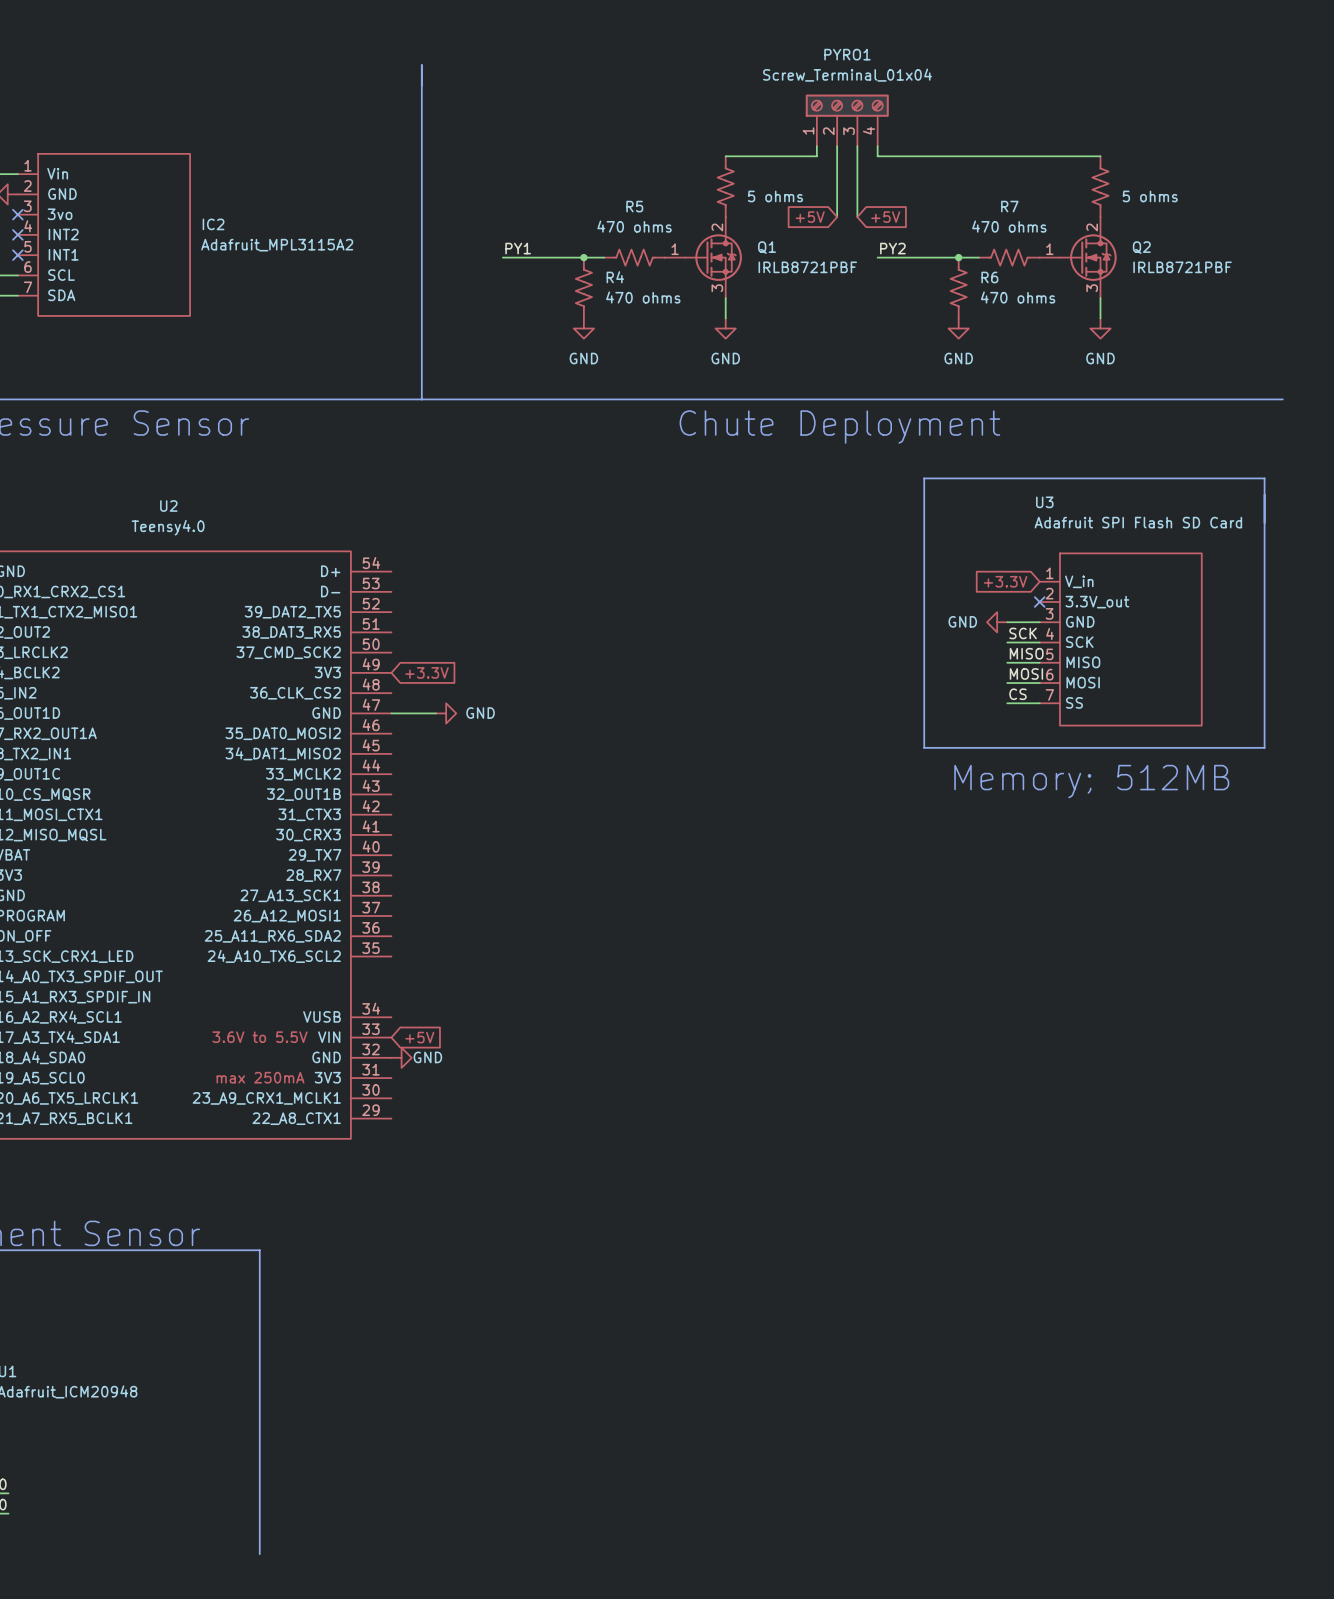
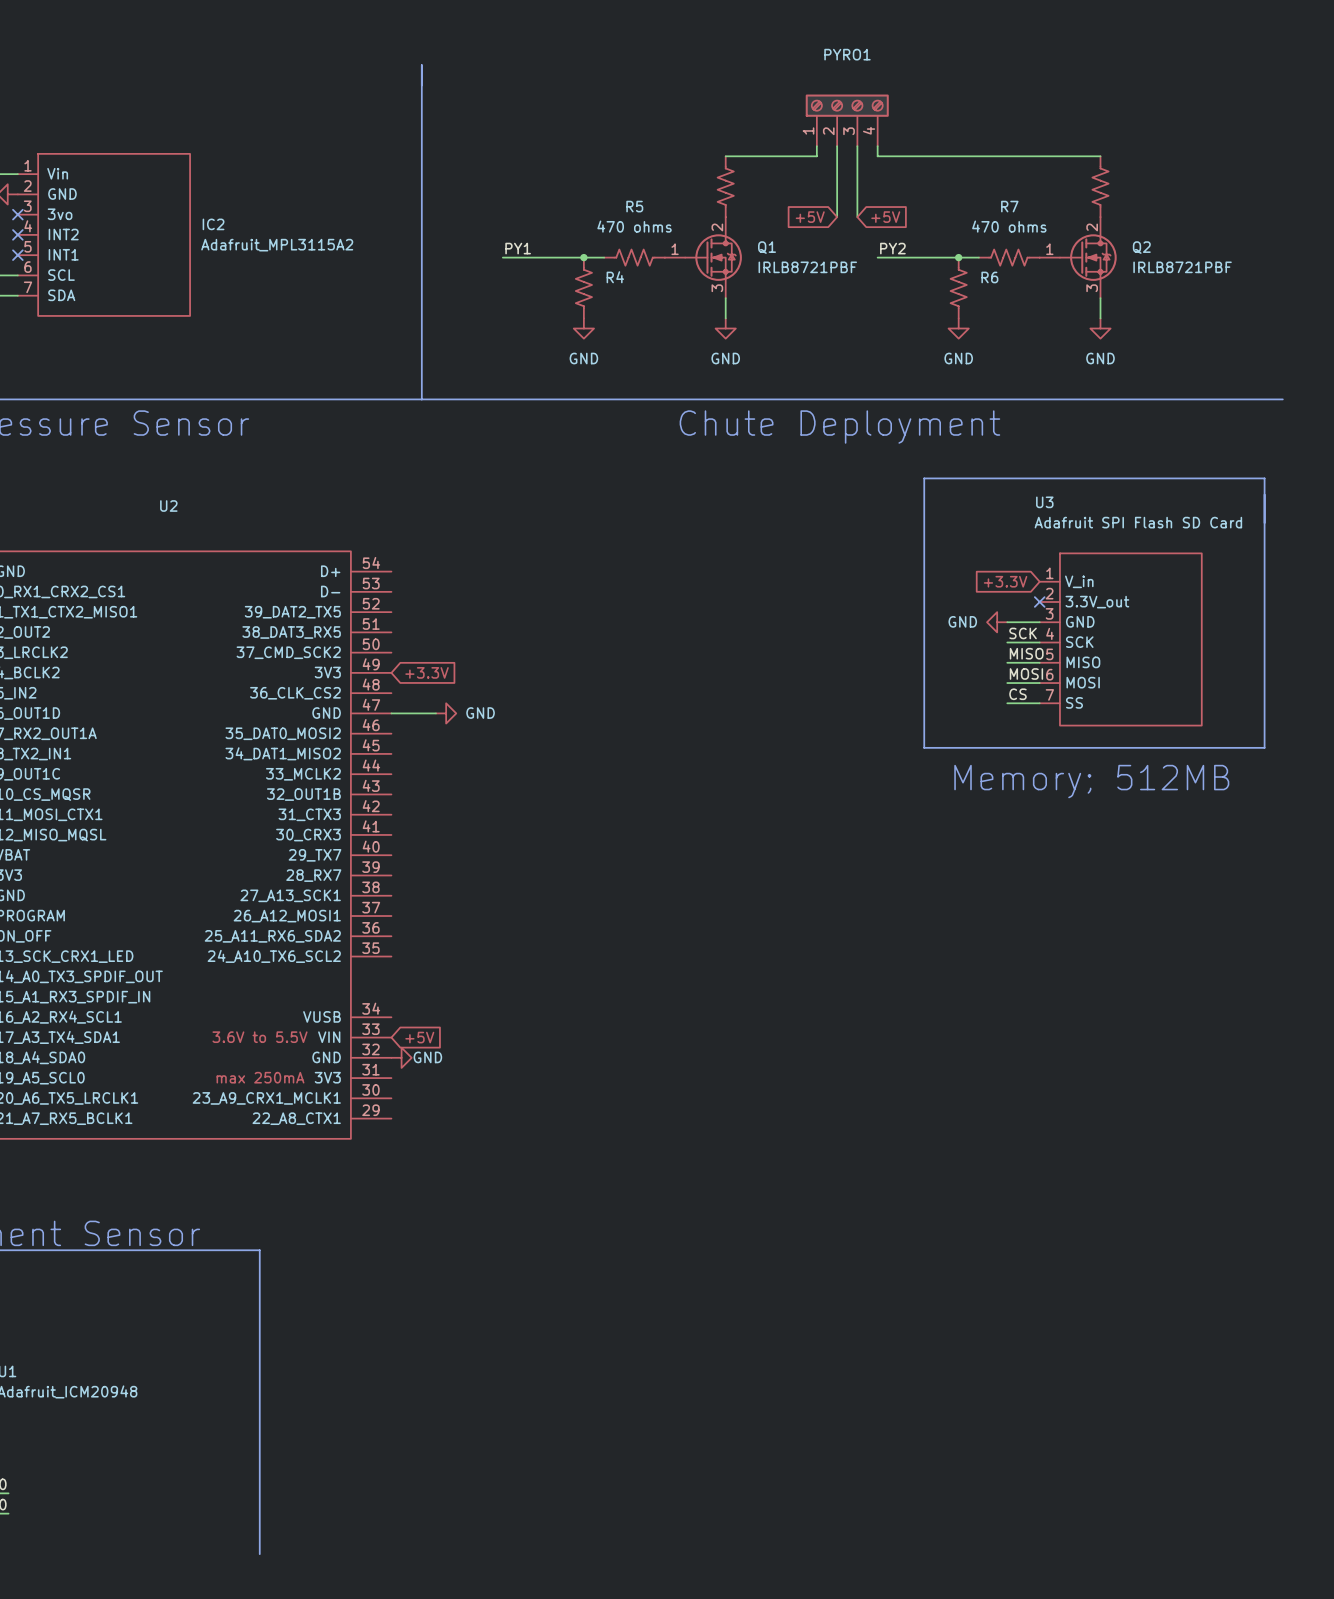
PYRO1 value: Screw_Terminal_01x04 (847, 75) -> none
part value: 5 ohms (775, 196) -> none
part value: 5 ohms (1150, 196) -> none
R4 value: 470 ohms (643, 297) -> none
R6 value: 470 ohms (1018, 297) -> none
U2 value: Teensy4.0 (168, 527) -> none

